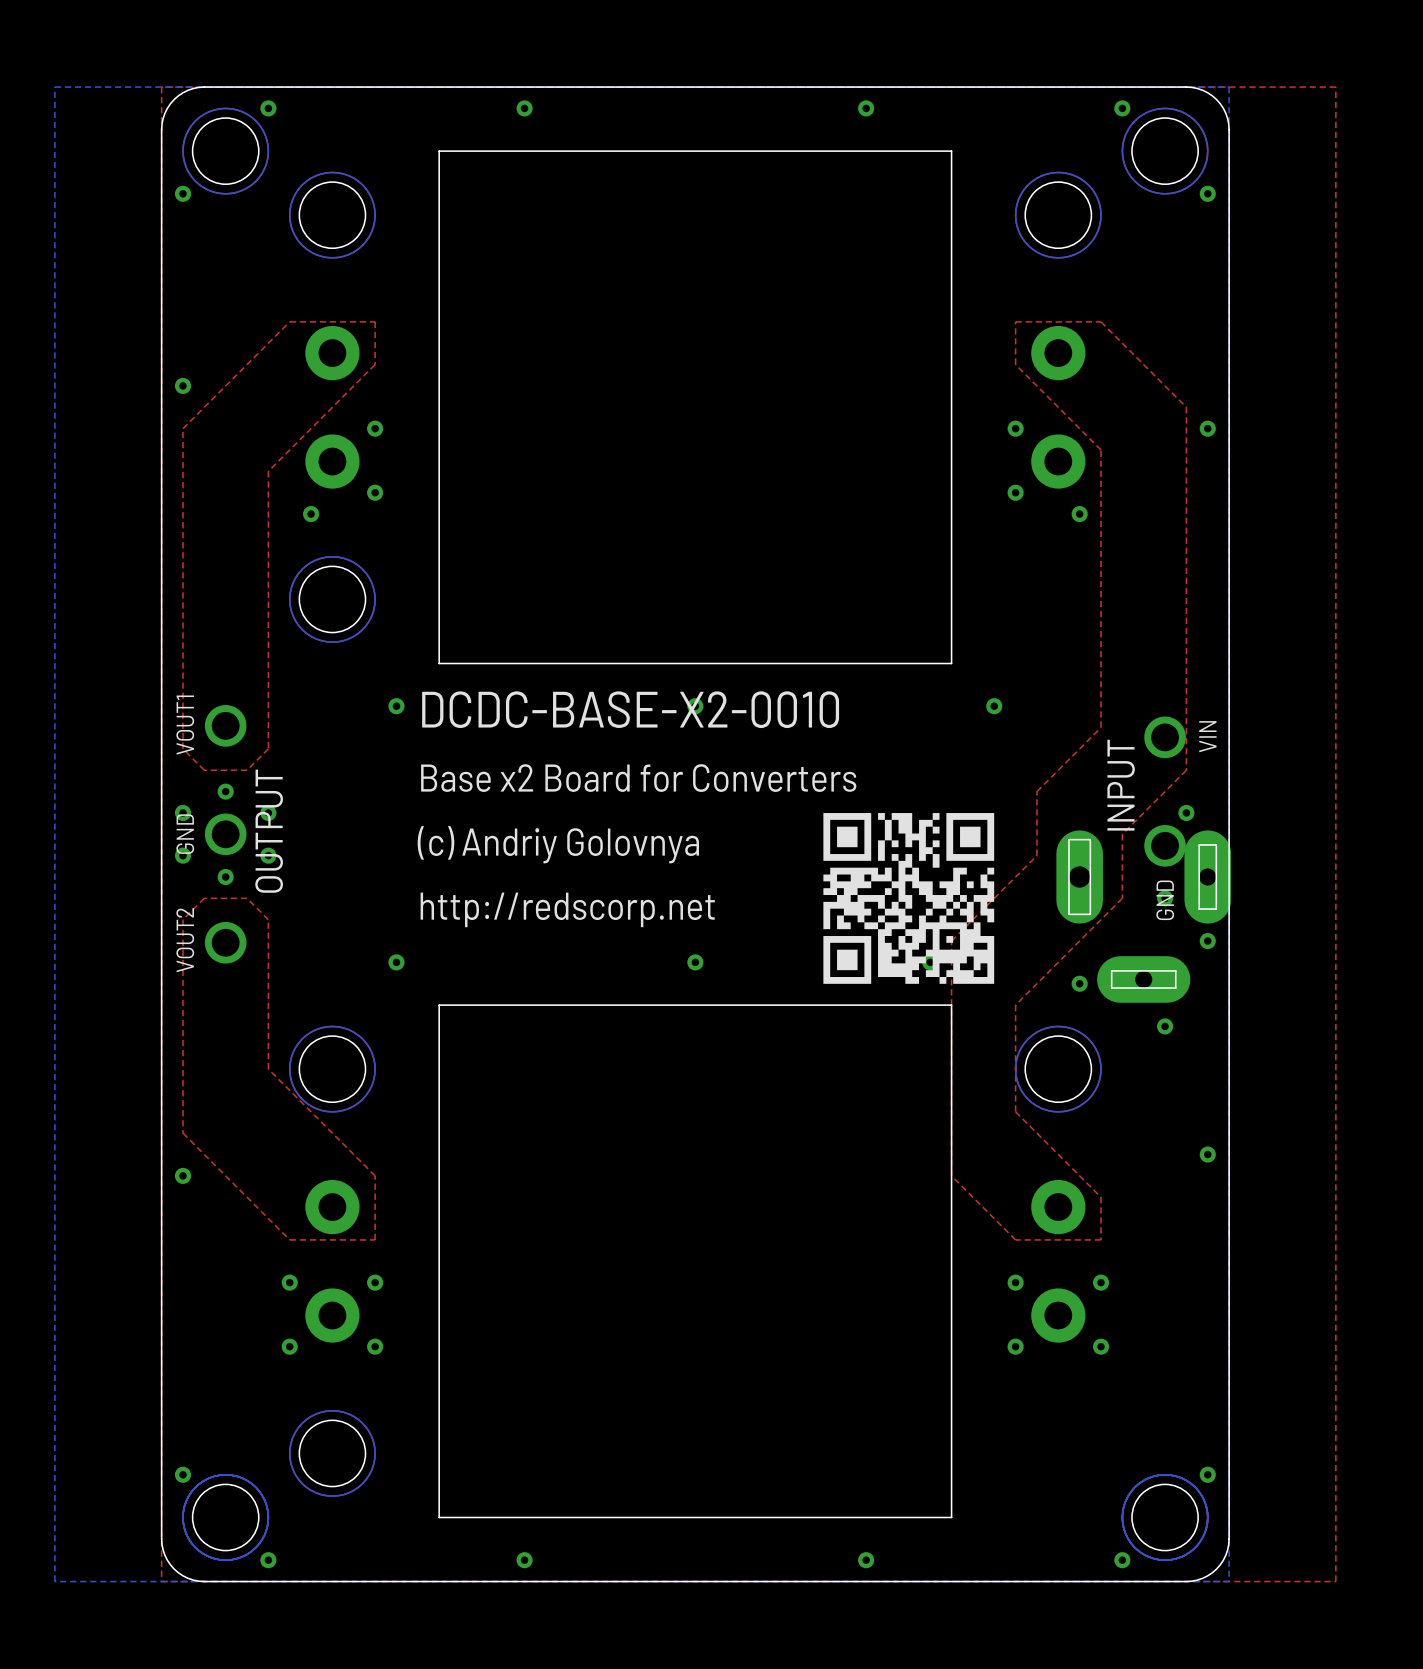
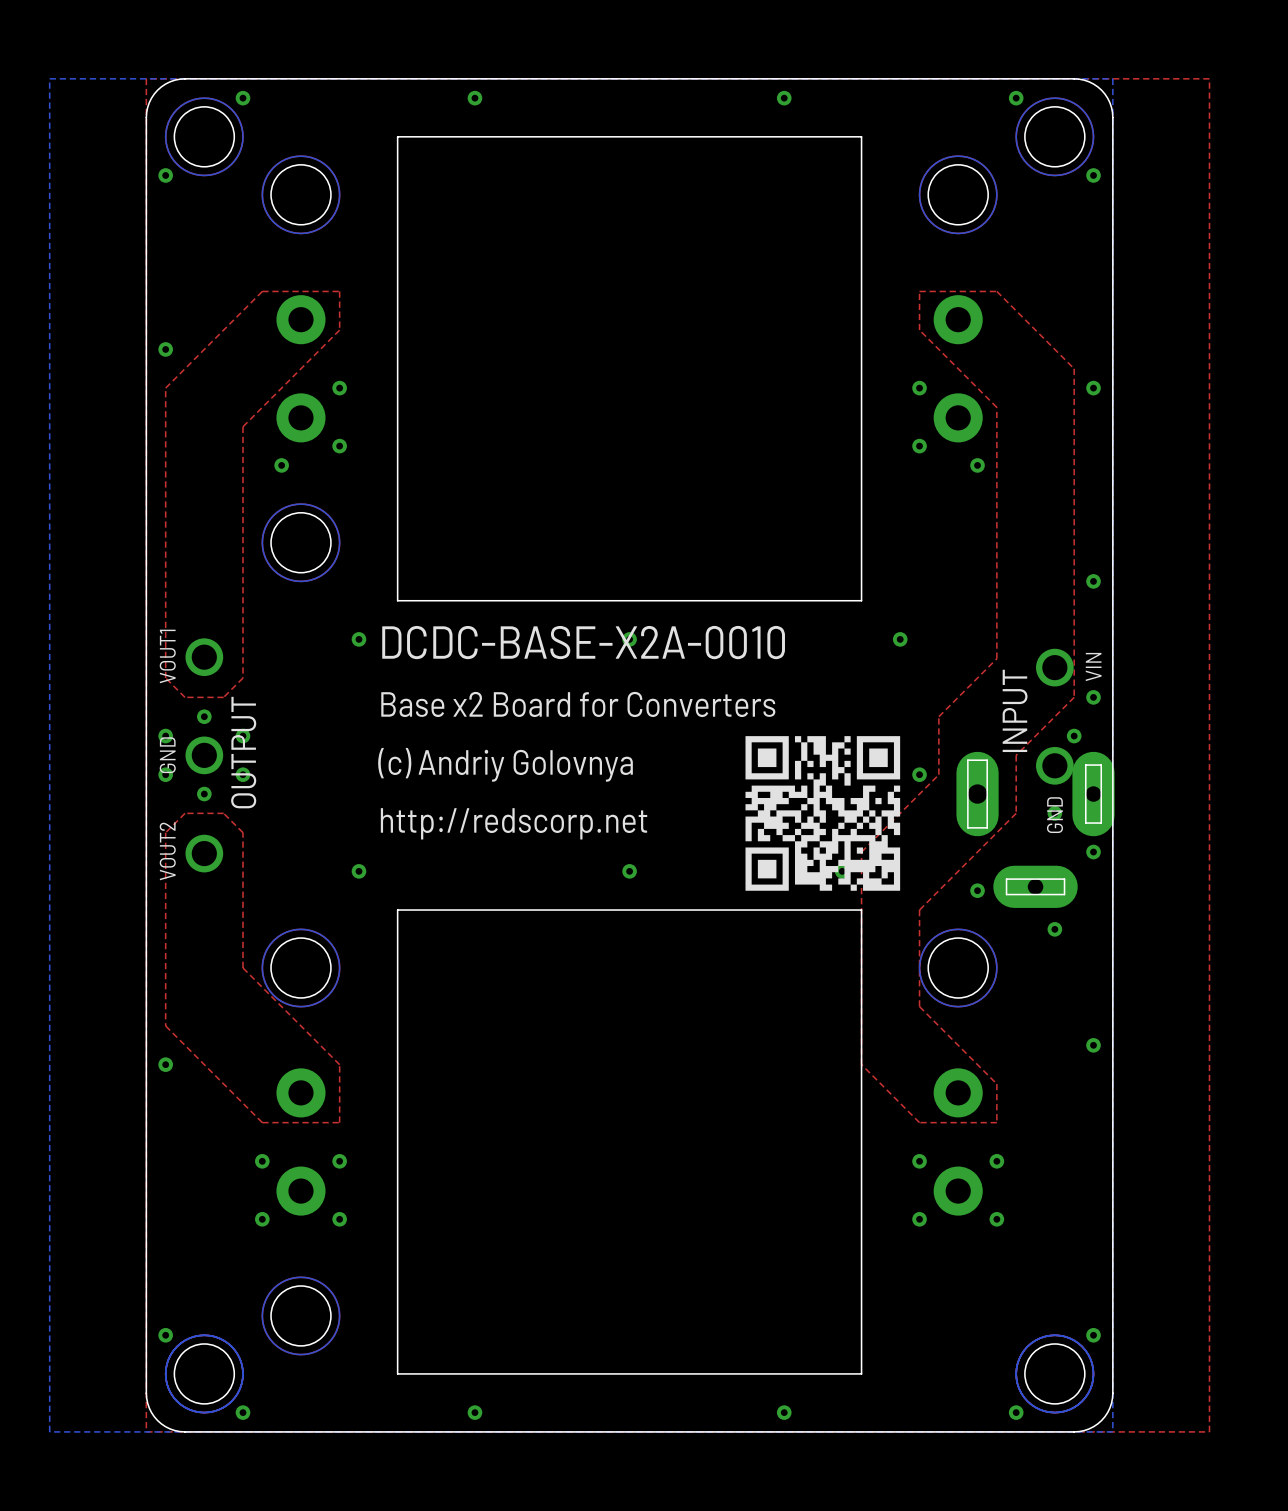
via: none -> (1093, 581)
text: DCDC-BASE-X2-0010 (630, 709) -> DCDC-BASE-X2A-0010 (583, 642)
via: none -> (1093, 697)
via: none -> (919, 774)

